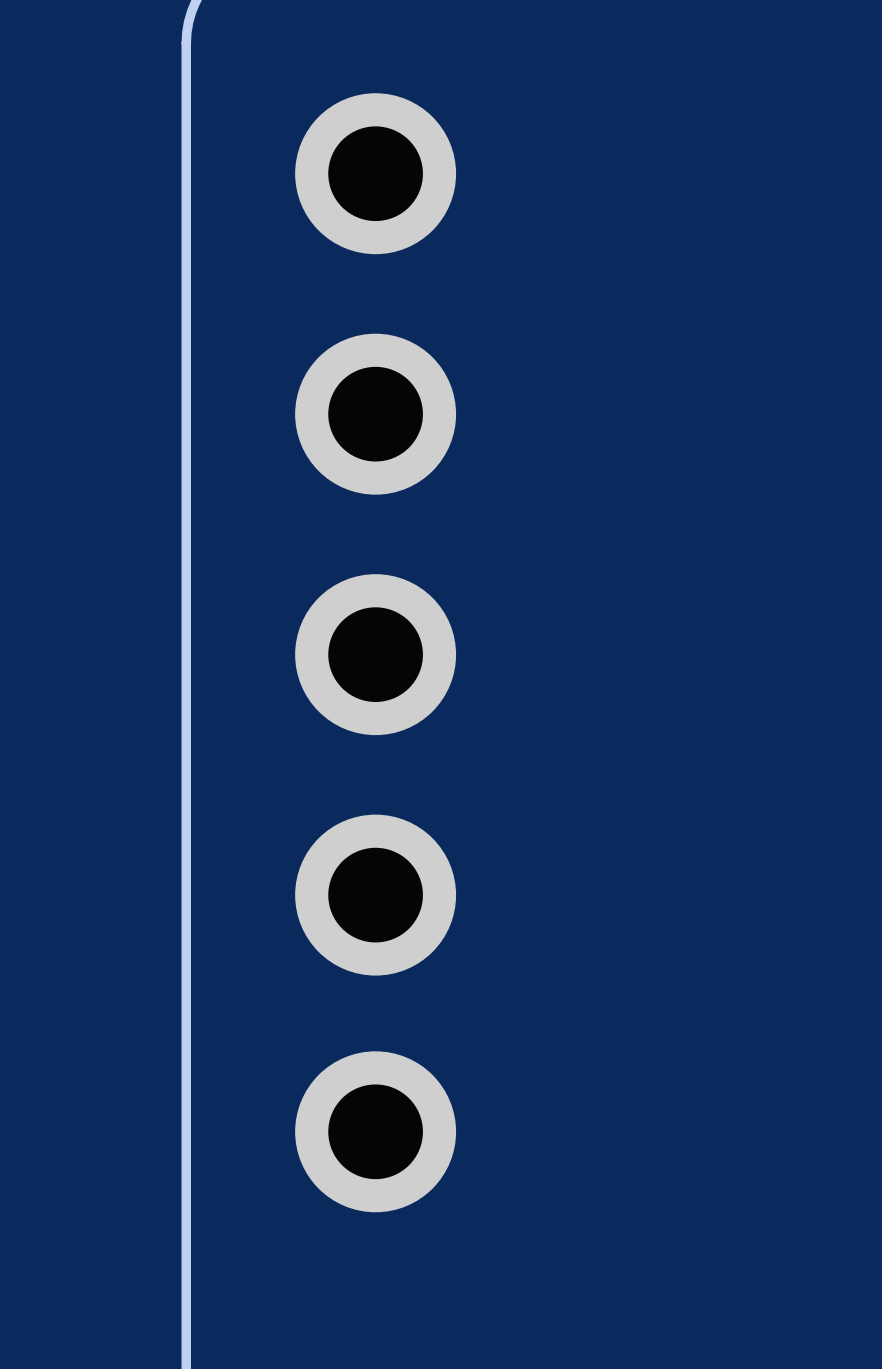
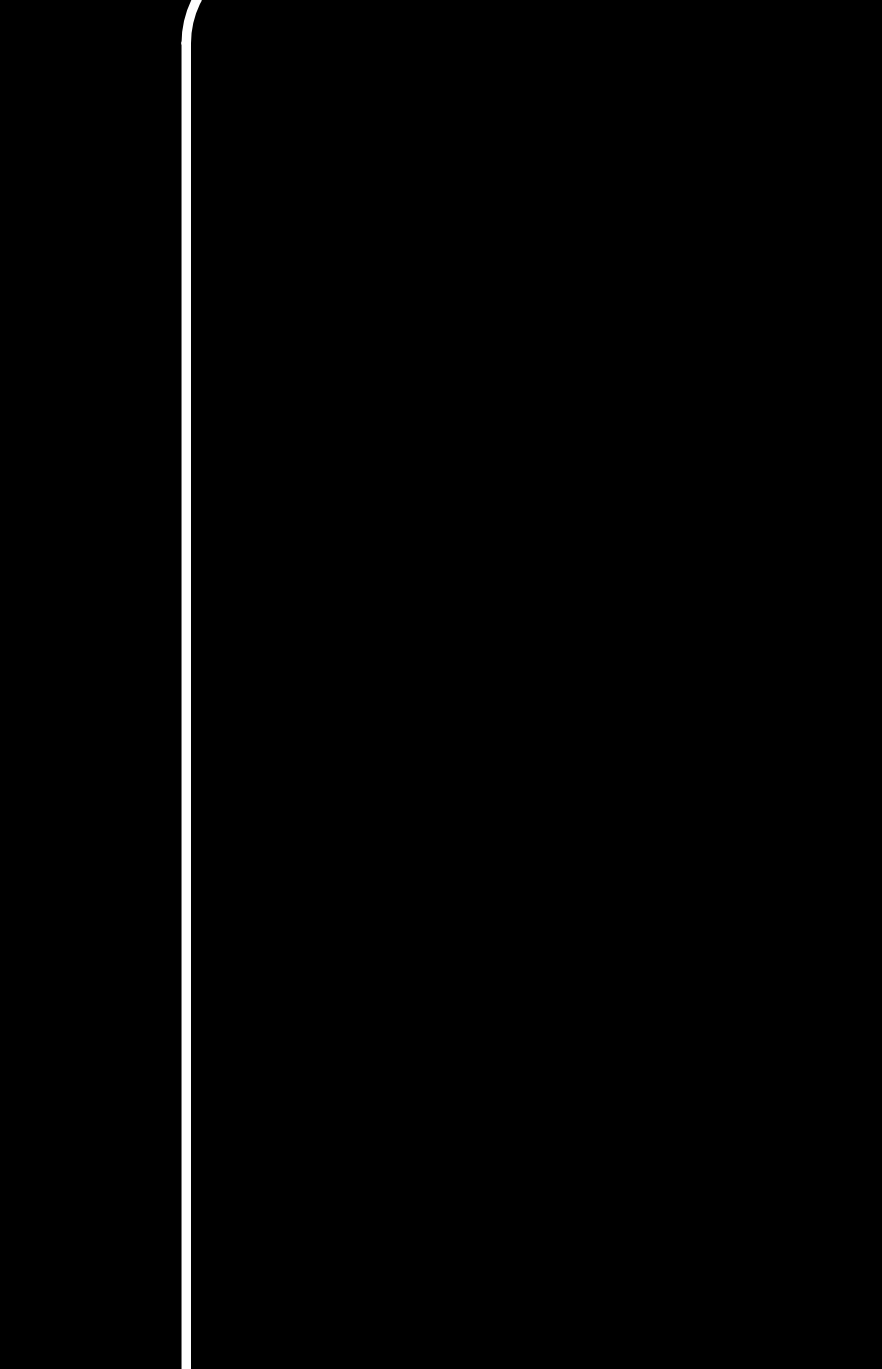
part: (375, 652) -> none

